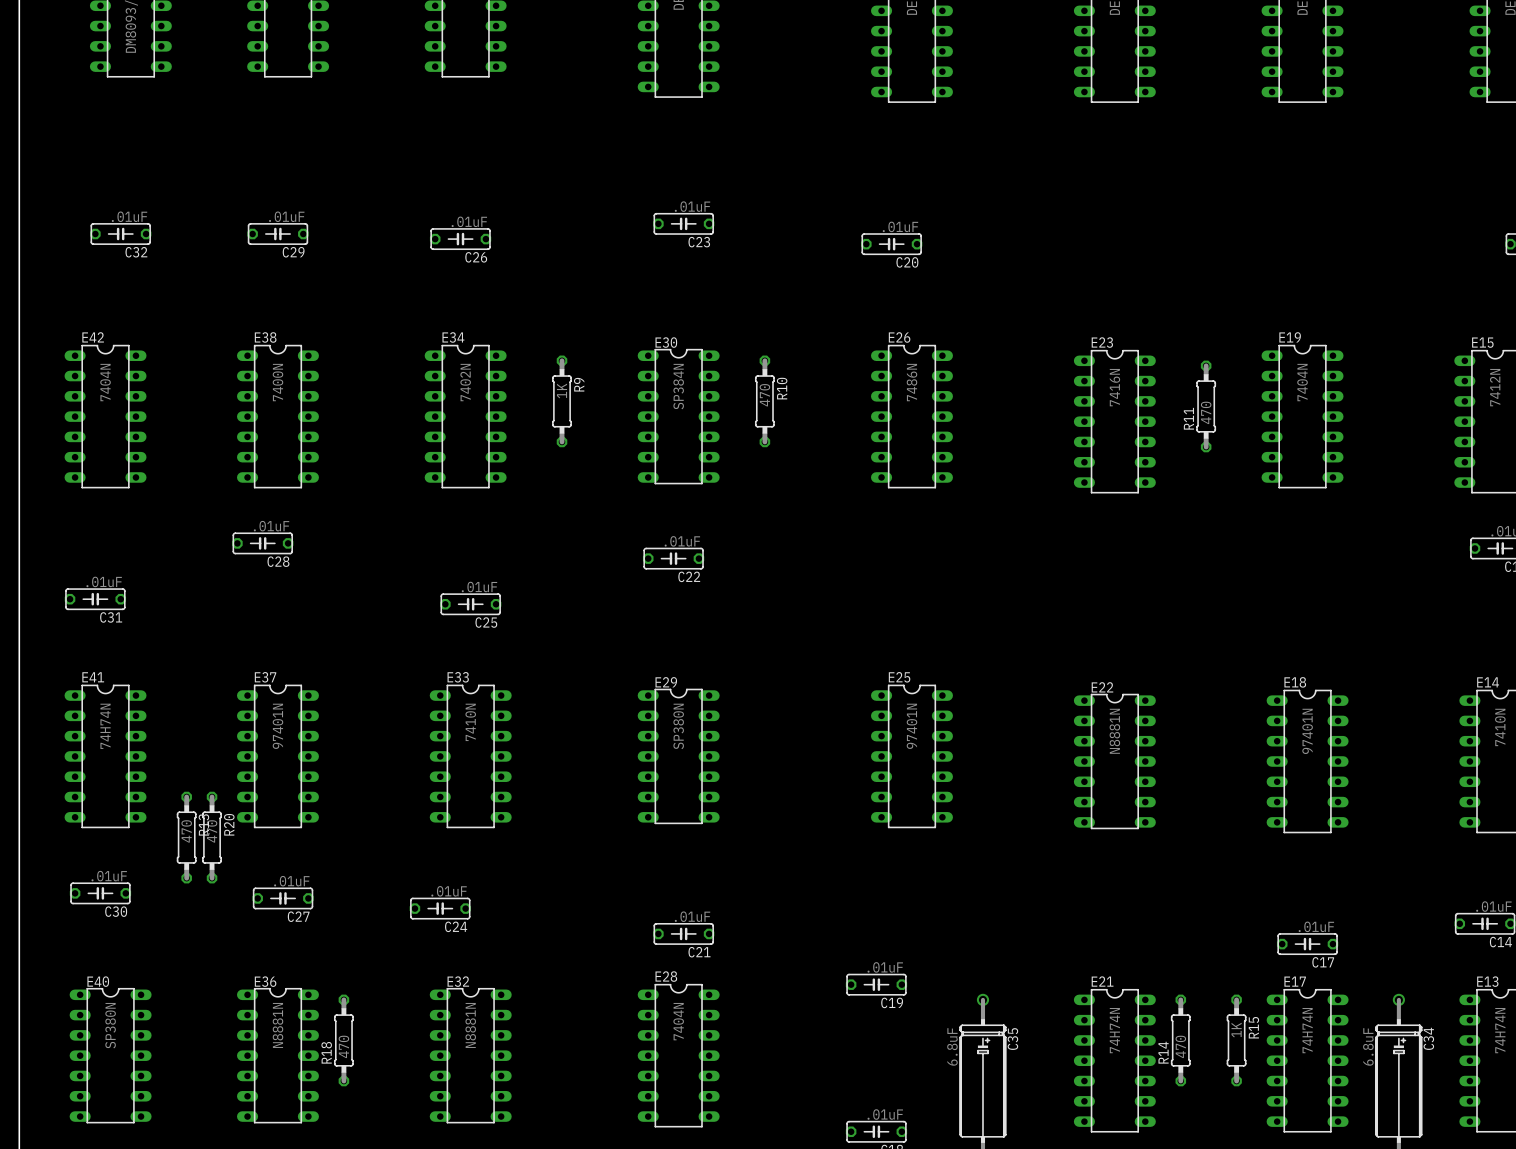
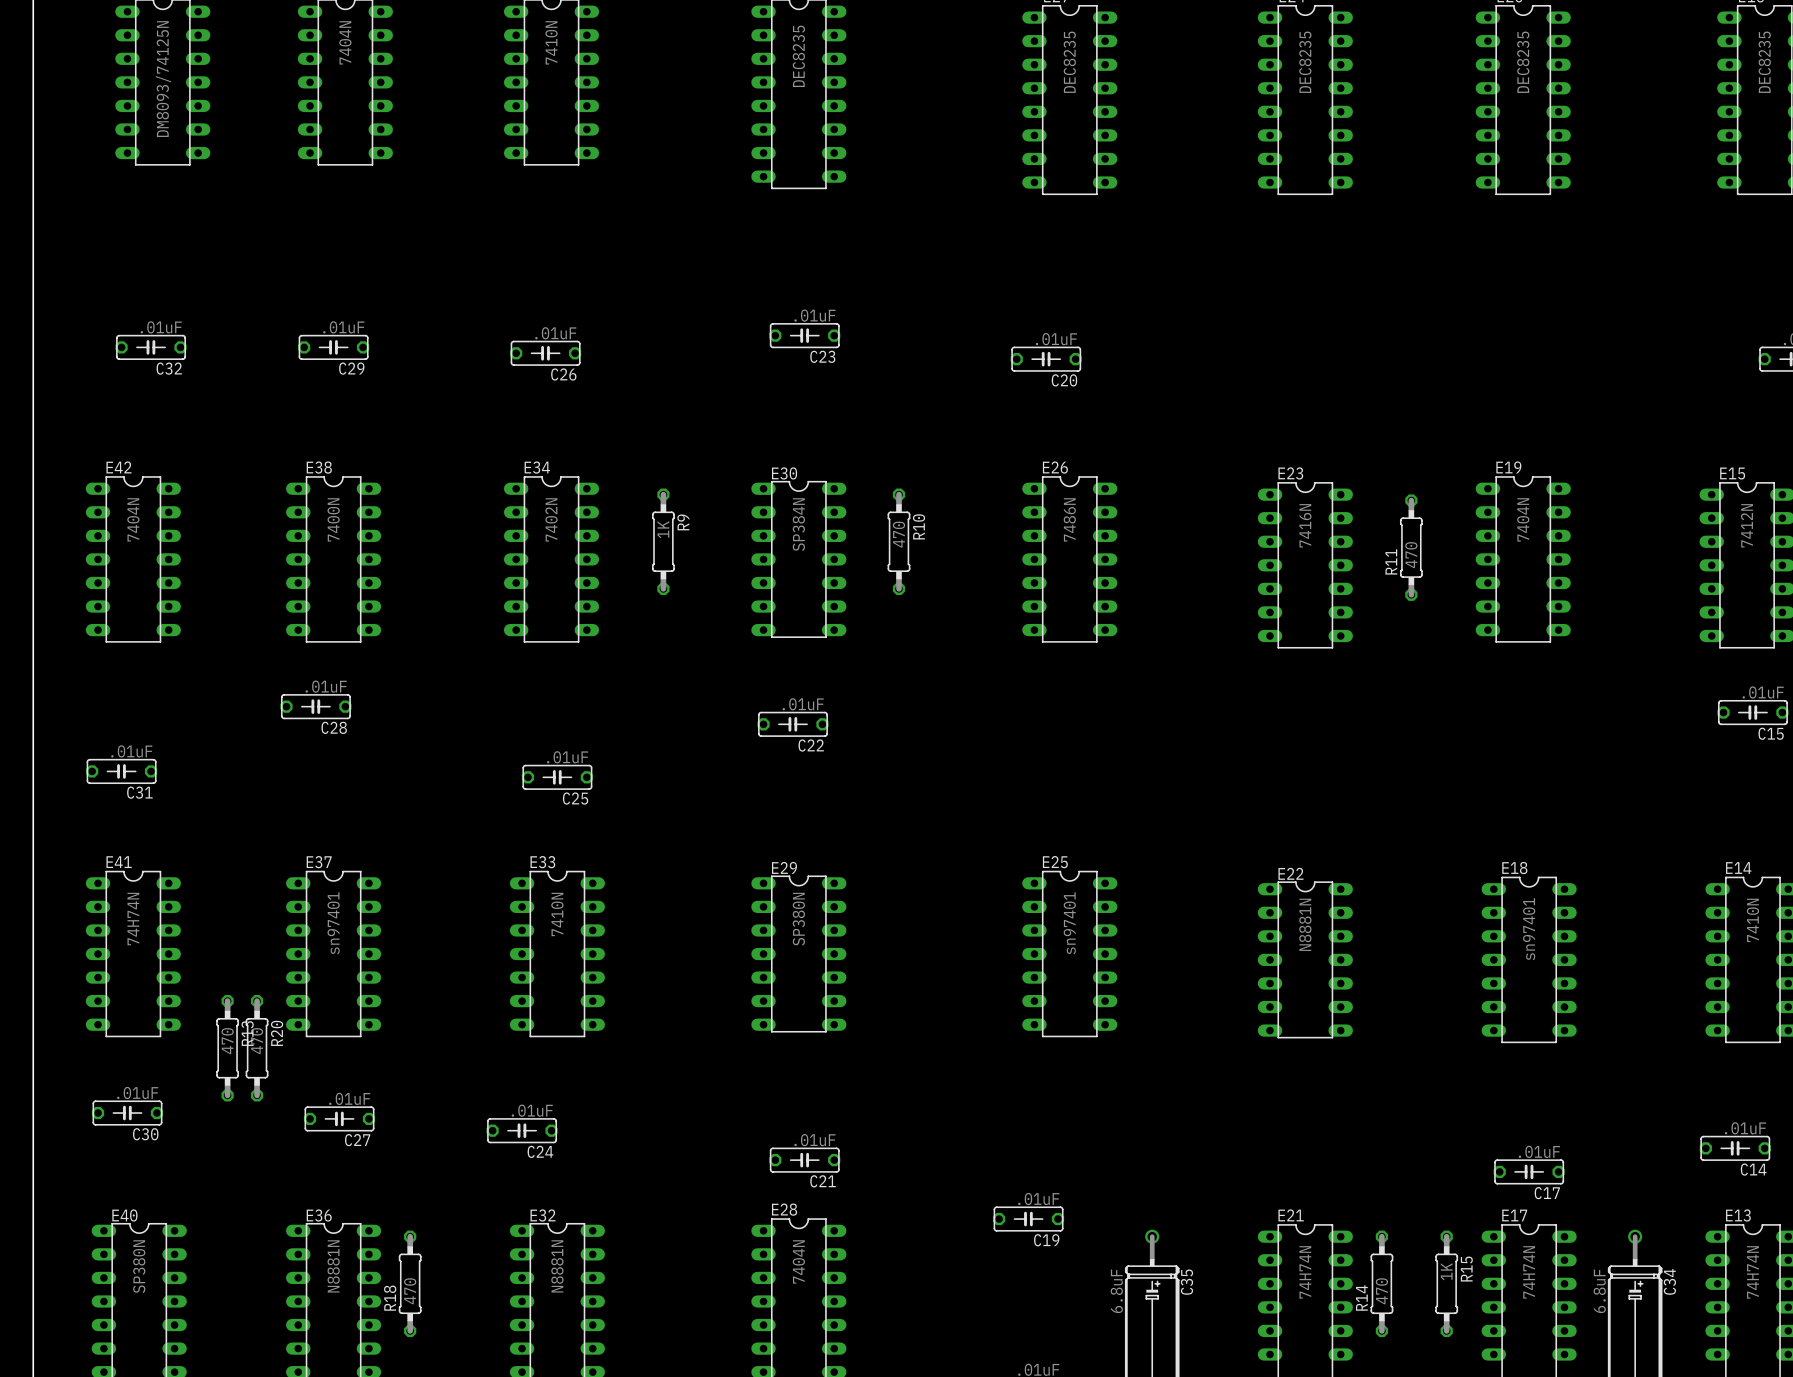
E37 value: 97401N (277, 726) -> sn97401 (333, 923)
E25 value: 97401N (911, 726) -> sn97401 (1069, 923)
E18 value: 97401N (1307, 731) -> sn97401 (1529, 929)

